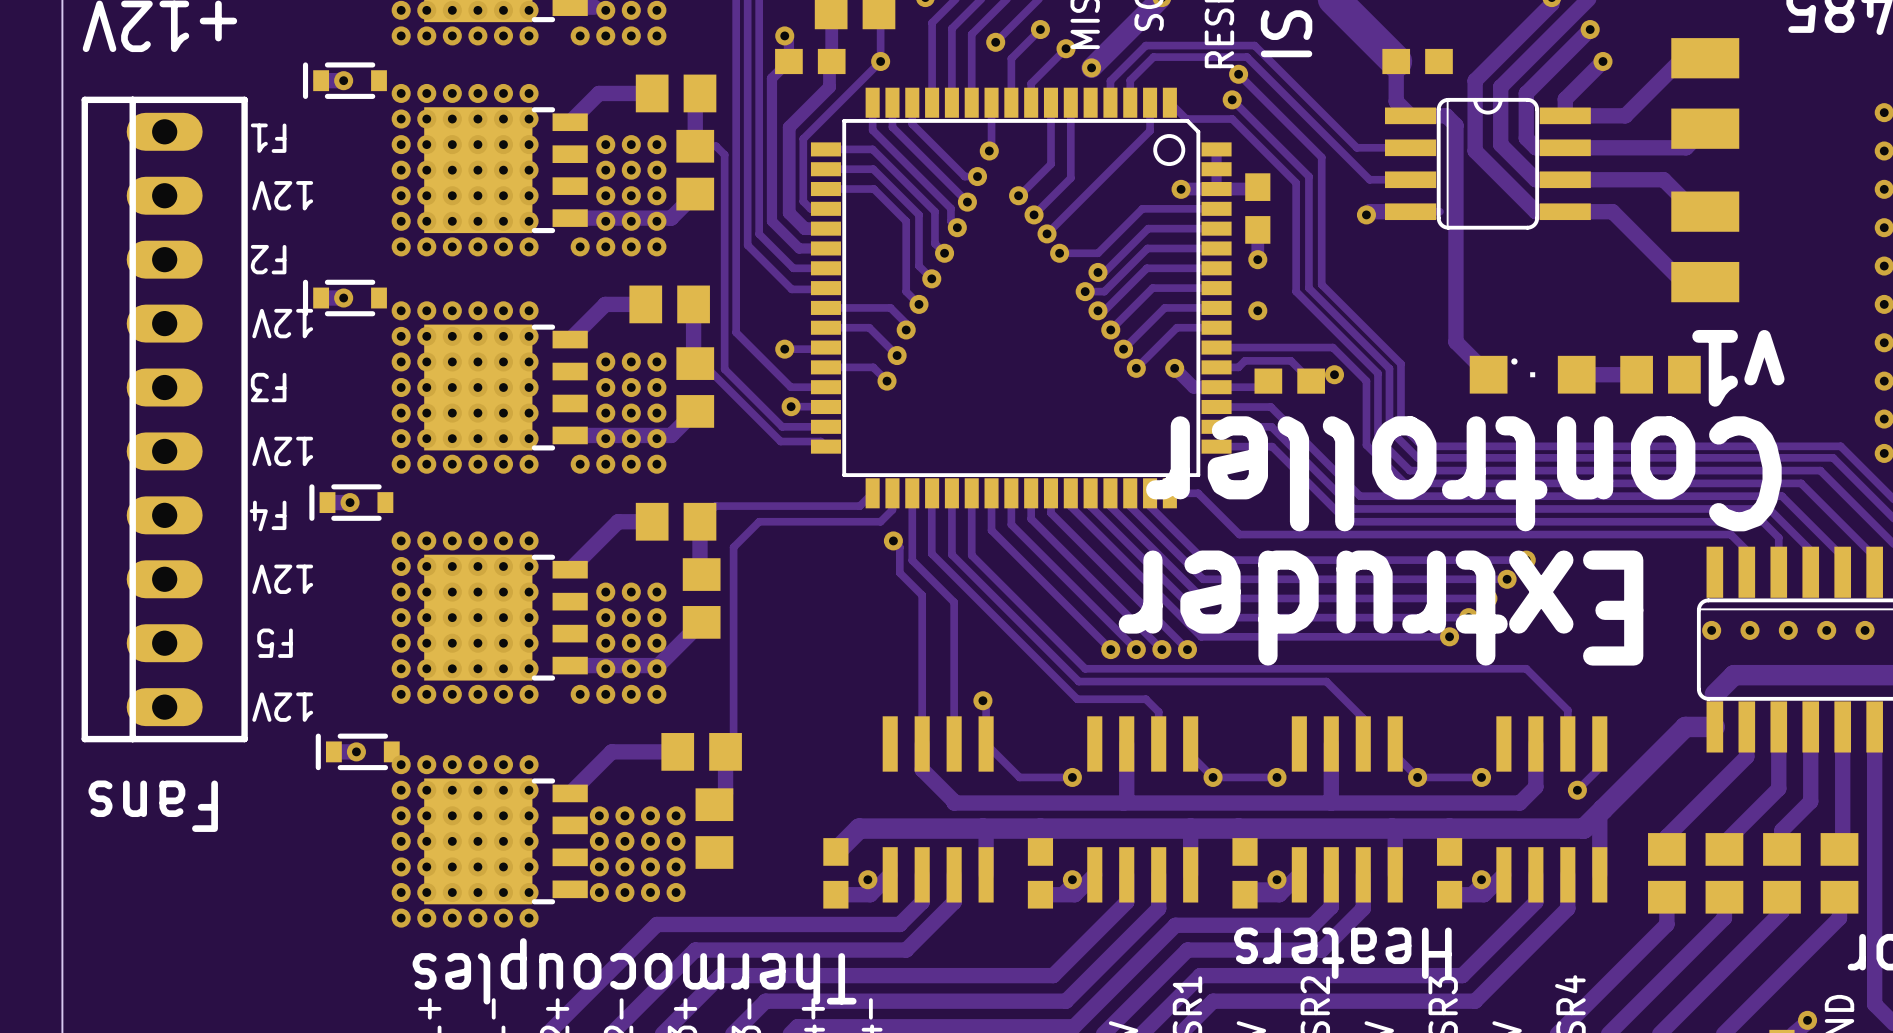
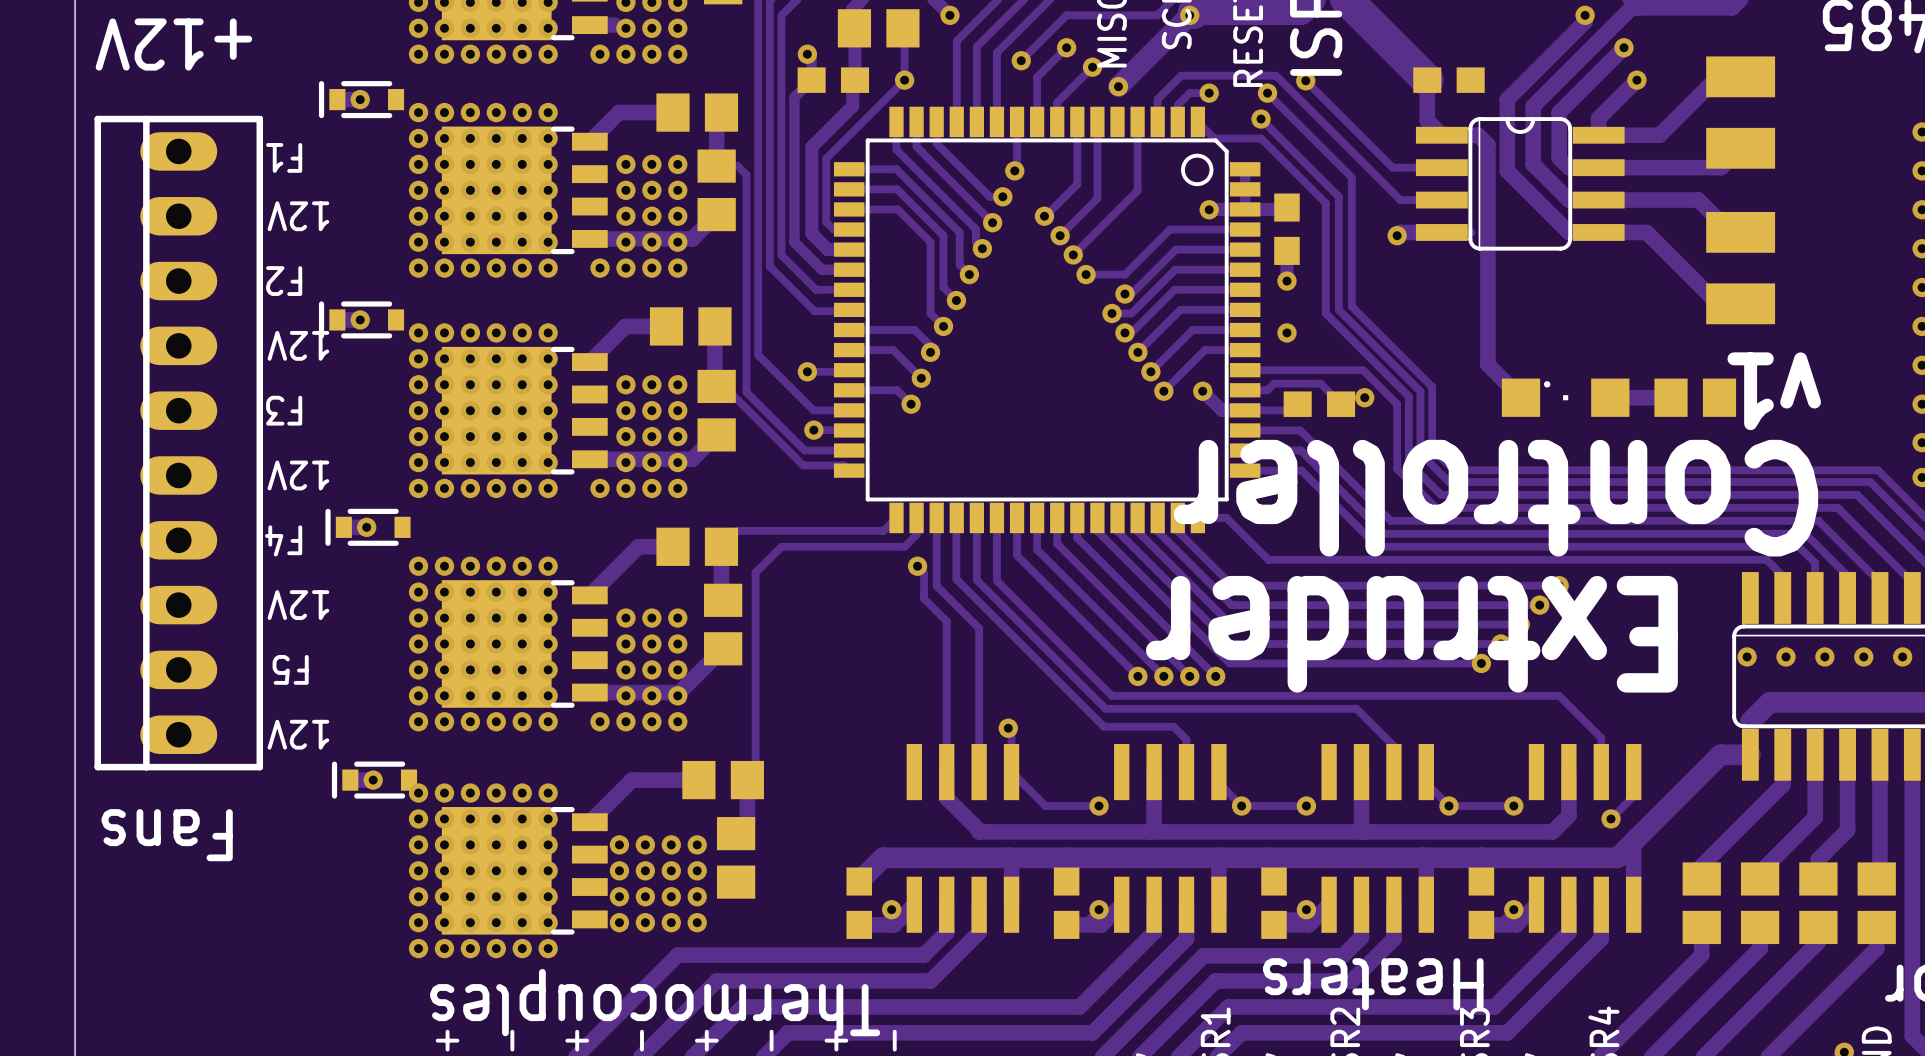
via: none -> (1305, 80)
track: none -> (1209, 93) (1189, 93) (1177, 105) (1177, 121)
via: none -> (1209, 93)
track: (1110, 102) (1110, 80) (1145, 45) (1254, 45) (1356, 147) (1362, 147) -> (1305, 80) (1392, 167)
track: (1150, 102) (1150, 130) (1110, 170) -> (1137, 121) (1137, 190)

